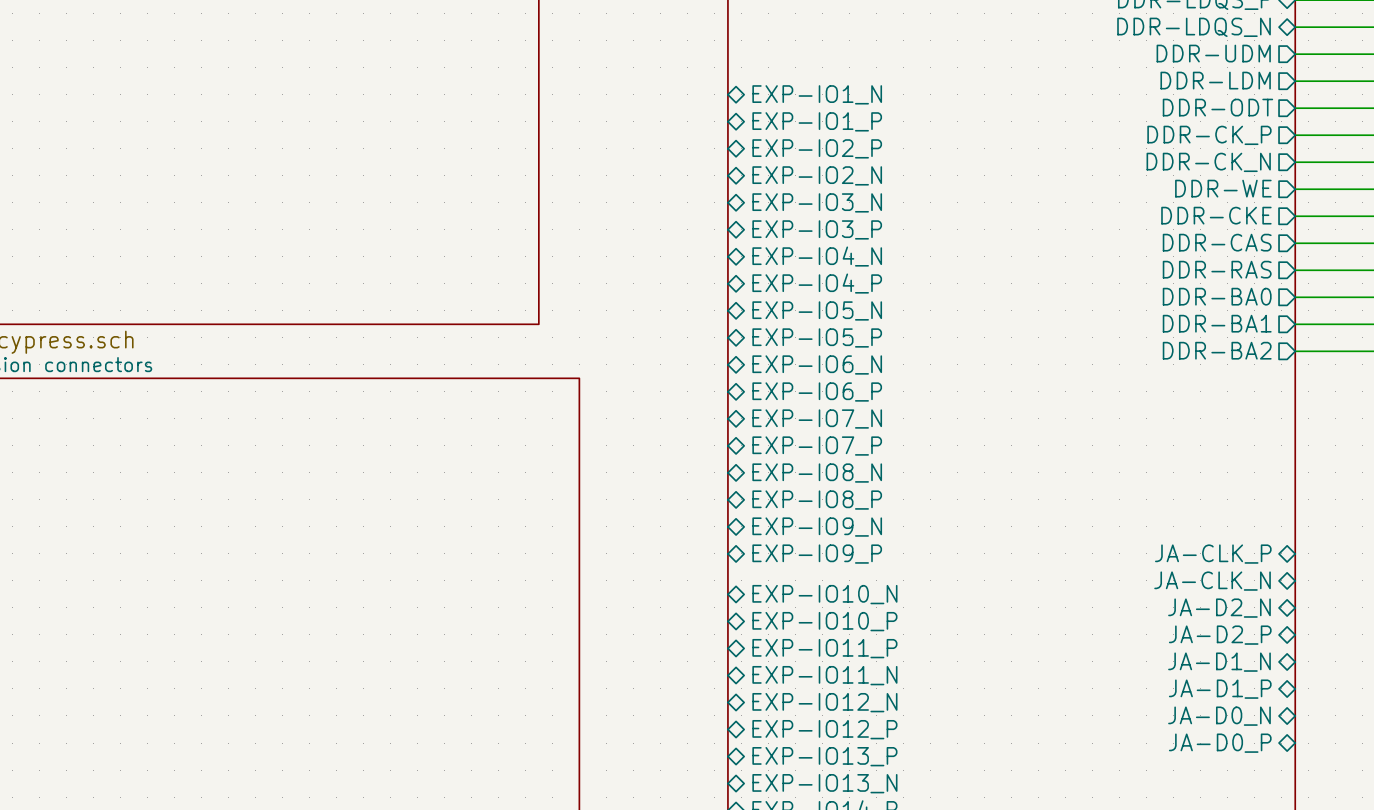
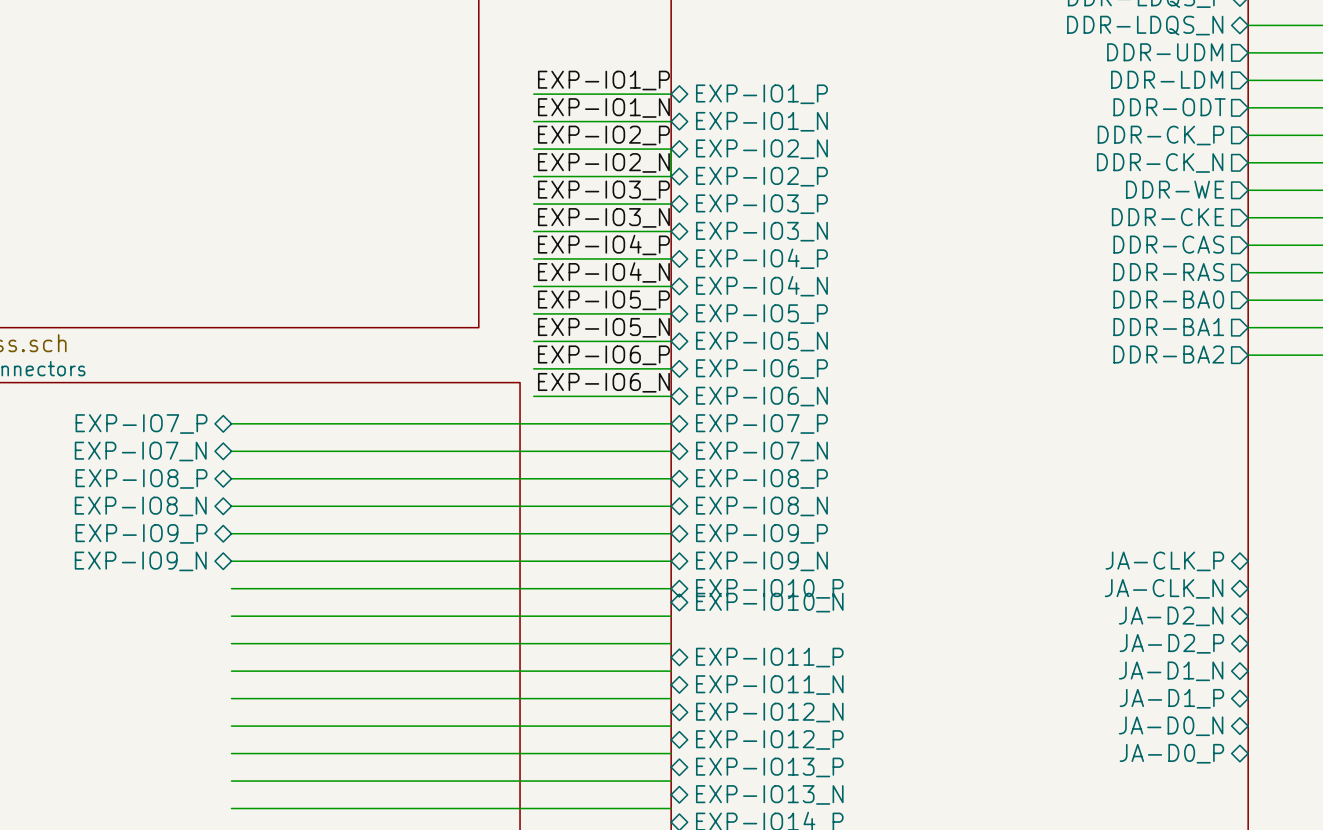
label: none -> EXP-IO1_P (603, 80)
wire: none -> (533, 94) (671, 94)
sheet pin: EXP-IO1_N (817, 94) -> EXP-IO1_P (761, 94)
label: none -> EXP-IO1_N (603, 107)
wire: none -> (533, 121) (671, 121)
sheet pin: EXP-IO1_P (817, 121) -> EXP-IO1_N (761, 121)
label: none -> EXP-IO2_P (603, 135)
wire: none -> (533, 149) (671, 149) (671, 176) (533, 176)
sheet pin: EXP-IO2_P (817, 148) -> EXP-IO2_N (761, 149)
label: none -> EXP-IO2_N (603, 162)
sheet pin: EXP-IO2_N (817, 175) -> EXP-IO2_P (761, 176)
label: none -> EXP-IO3_P (603, 190)
wire: none -> (533, 204) (671, 204)
sheet pin: EXP-IO3_N (817, 202) -> EXP-IO3_P (761, 204)
label: none -> EXP-IO3_N (603, 217)
wire: none -> (533, 231) (671, 231)
sheet pin: EXP-IO3_P (817, 229) -> EXP-IO3_N (761, 231)
label: none -> EXP-IO4_P (603, 244)
wire: none -> (533, 258) (671, 258)
sheet pin: EXP-IO4_N (817, 256) -> EXP-IO4_P (761, 258)
label: none -> EXP-IO4_N (603, 272)
wire: none -> (533, 286) (671, 286)
sheet pin: EXP-IO4_P (817, 283) -> EXP-IO4_N (761, 286)
label: none -> EXP-IO5_P (603, 300)
wire: none -> (533, 313) (671, 313)
sheet pin: EXP-IO5_N (817, 310) -> EXP-IO5_P (761, 314)
label: none -> EXP-IO5_N (603, 327)
wire: none -> (533, 341) (671, 341)
sheet pin: EXP-IO5_P (817, 337) -> EXP-IO5_N (761, 341)
label: none -> EXP-IO6_P (603, 355)
wire: none -> (533, 368) (671, 368)
sheet pin: EXP-IO6_N (817, 364) -> EXP-IO6_P (761, 369)
label: none -> EXP-IO6_N (603, 382)
wire: none -> (533, 396) (671, 396)
sheet pin: EXP-IO6_P (817, 392) -> EXP-IO6_N (761, 396)
wire: none -> (231, 423) (671, 423)
sheet pin: none -> EXP-IO7_P (141, 424)
sheet pin: EXP-IO7_N (817, 419) -> EXP-IO7_P (761, 424)
wire: none -> (231, 451) (671, 451)
sheet pin: none -> EXP-IO7_N (140, 451)
sheet pin: EXP-IO7_P (817, 446) -> EXP-IO7_N (761, 451)
wire: none -> (231, 478) (671, 478)
sheet pin: none -> EXP-IO8_P (141, 478)
sheet pin: EXP-IO8_N (817, 473) -> EXP-IO8_P (761, 478)
wire: none -> (231, 506) (671, 506)
sheet pin: none -> EXP-IO8_N (140, 506)
sheet pin: EXP-IO8_P (817, 500) -> EXP-IO8_N (761, 506)
wire: none -> (231, 533) (671, 533)
sheet pin: none -> EXP-IO9_P (141, 533)
sheet pin: EXP-IO9_N (817, 527) -> EXP-IO9_P (761, 533)
wire: none -> (231, 561) (671, 561)
sheet pin: none -> EXP-IO9_N (140, 561)
sheet pin: EXP-IO9_P (817, 554) -> EXP-IO9_N (761, 561)
wire: none -> (231, 588) (671, 588)
wire: none -> (231, 616) (671, 616)
sheet pin position: EXP-IO10_P (824, 621) -> EXP-IO10_P (769, 588)
wire: none -> (231, 643) (671, 643)
wire: none -> (231, 671) (671, 671)
wire: none -> (231, 698) (671, 698)
wire: none -> (231, 726) (671, 726)
wire: none -> (231, 753) (671, 753)
wire: none -> (231, 781) (671, 781)
wire: none -> (231, 808) (671, 808)

